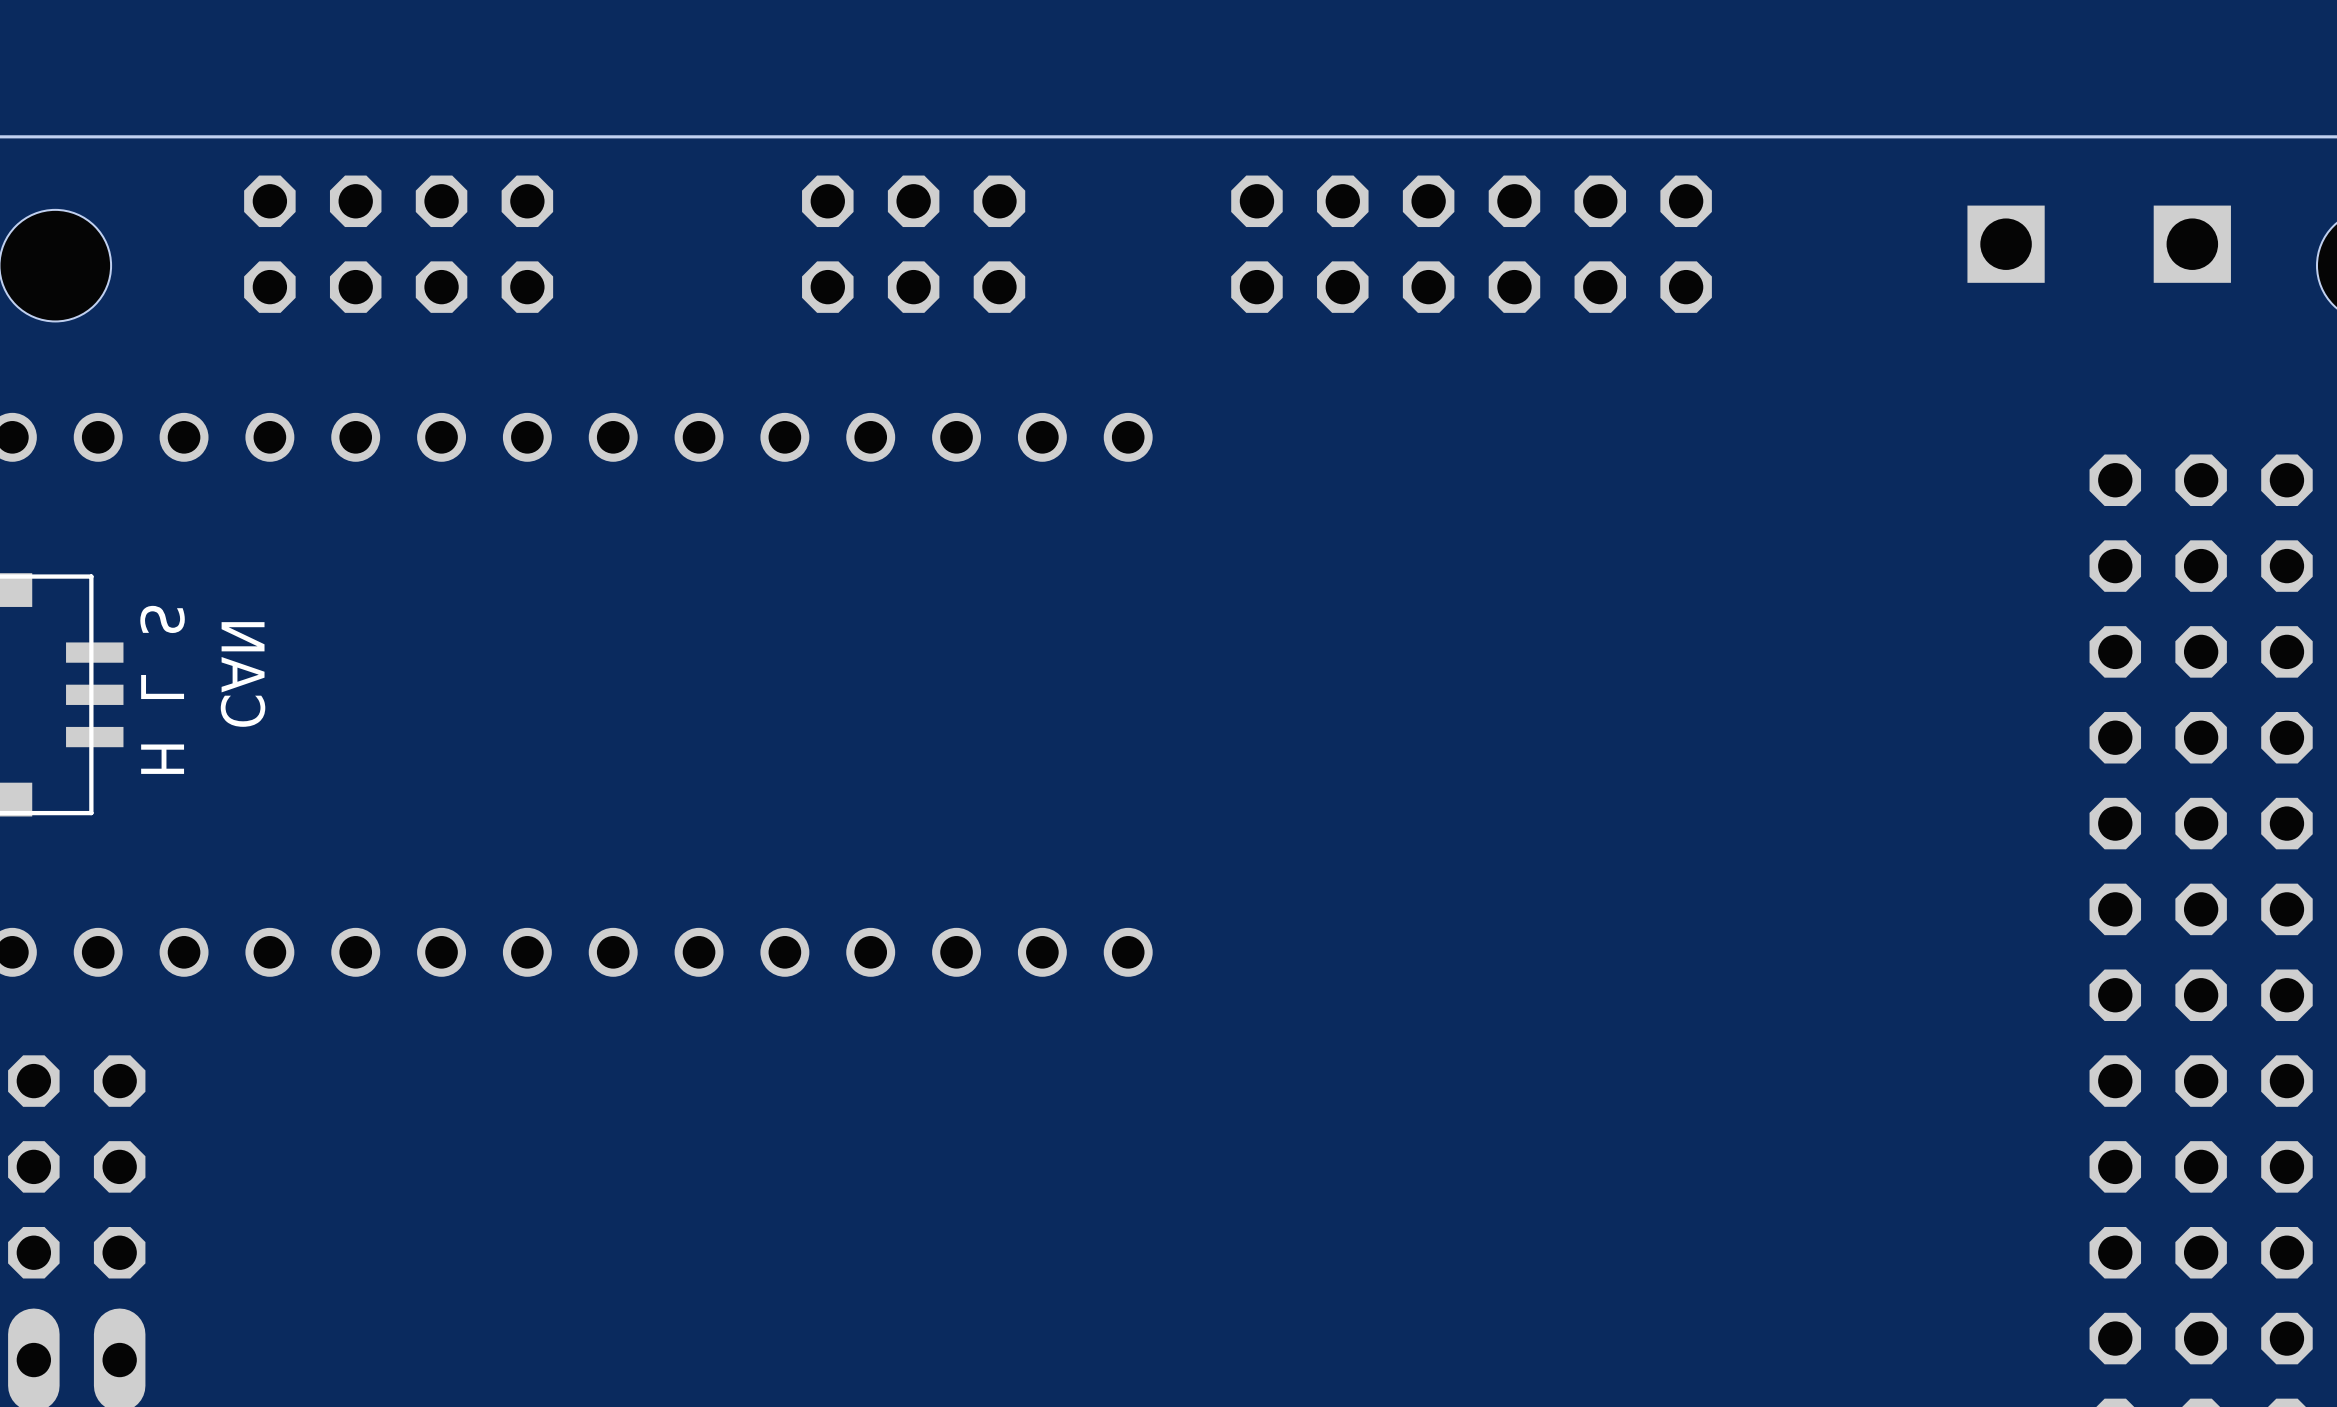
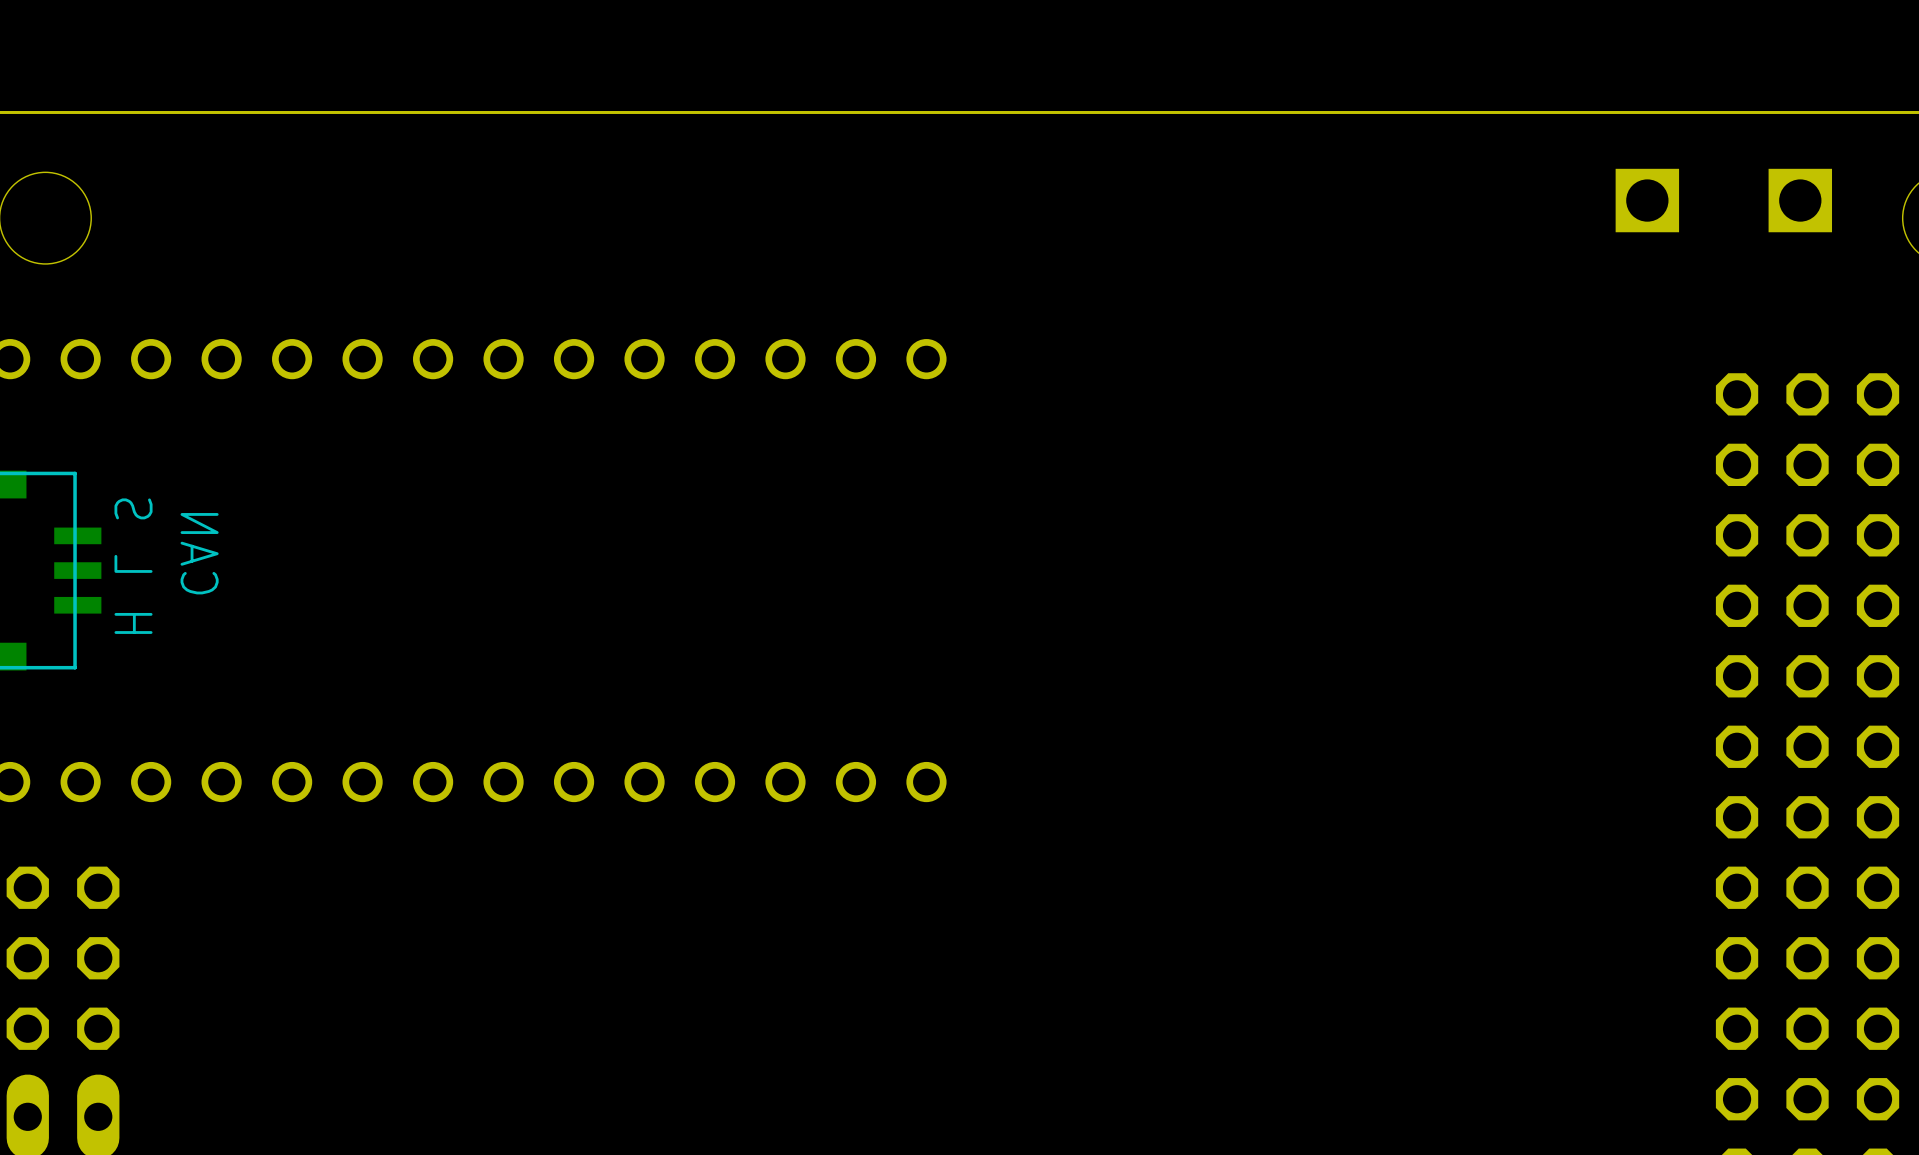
part: (398, 244) -> none
part: (913, 244) -> none
part: (1471, 244) -> none

